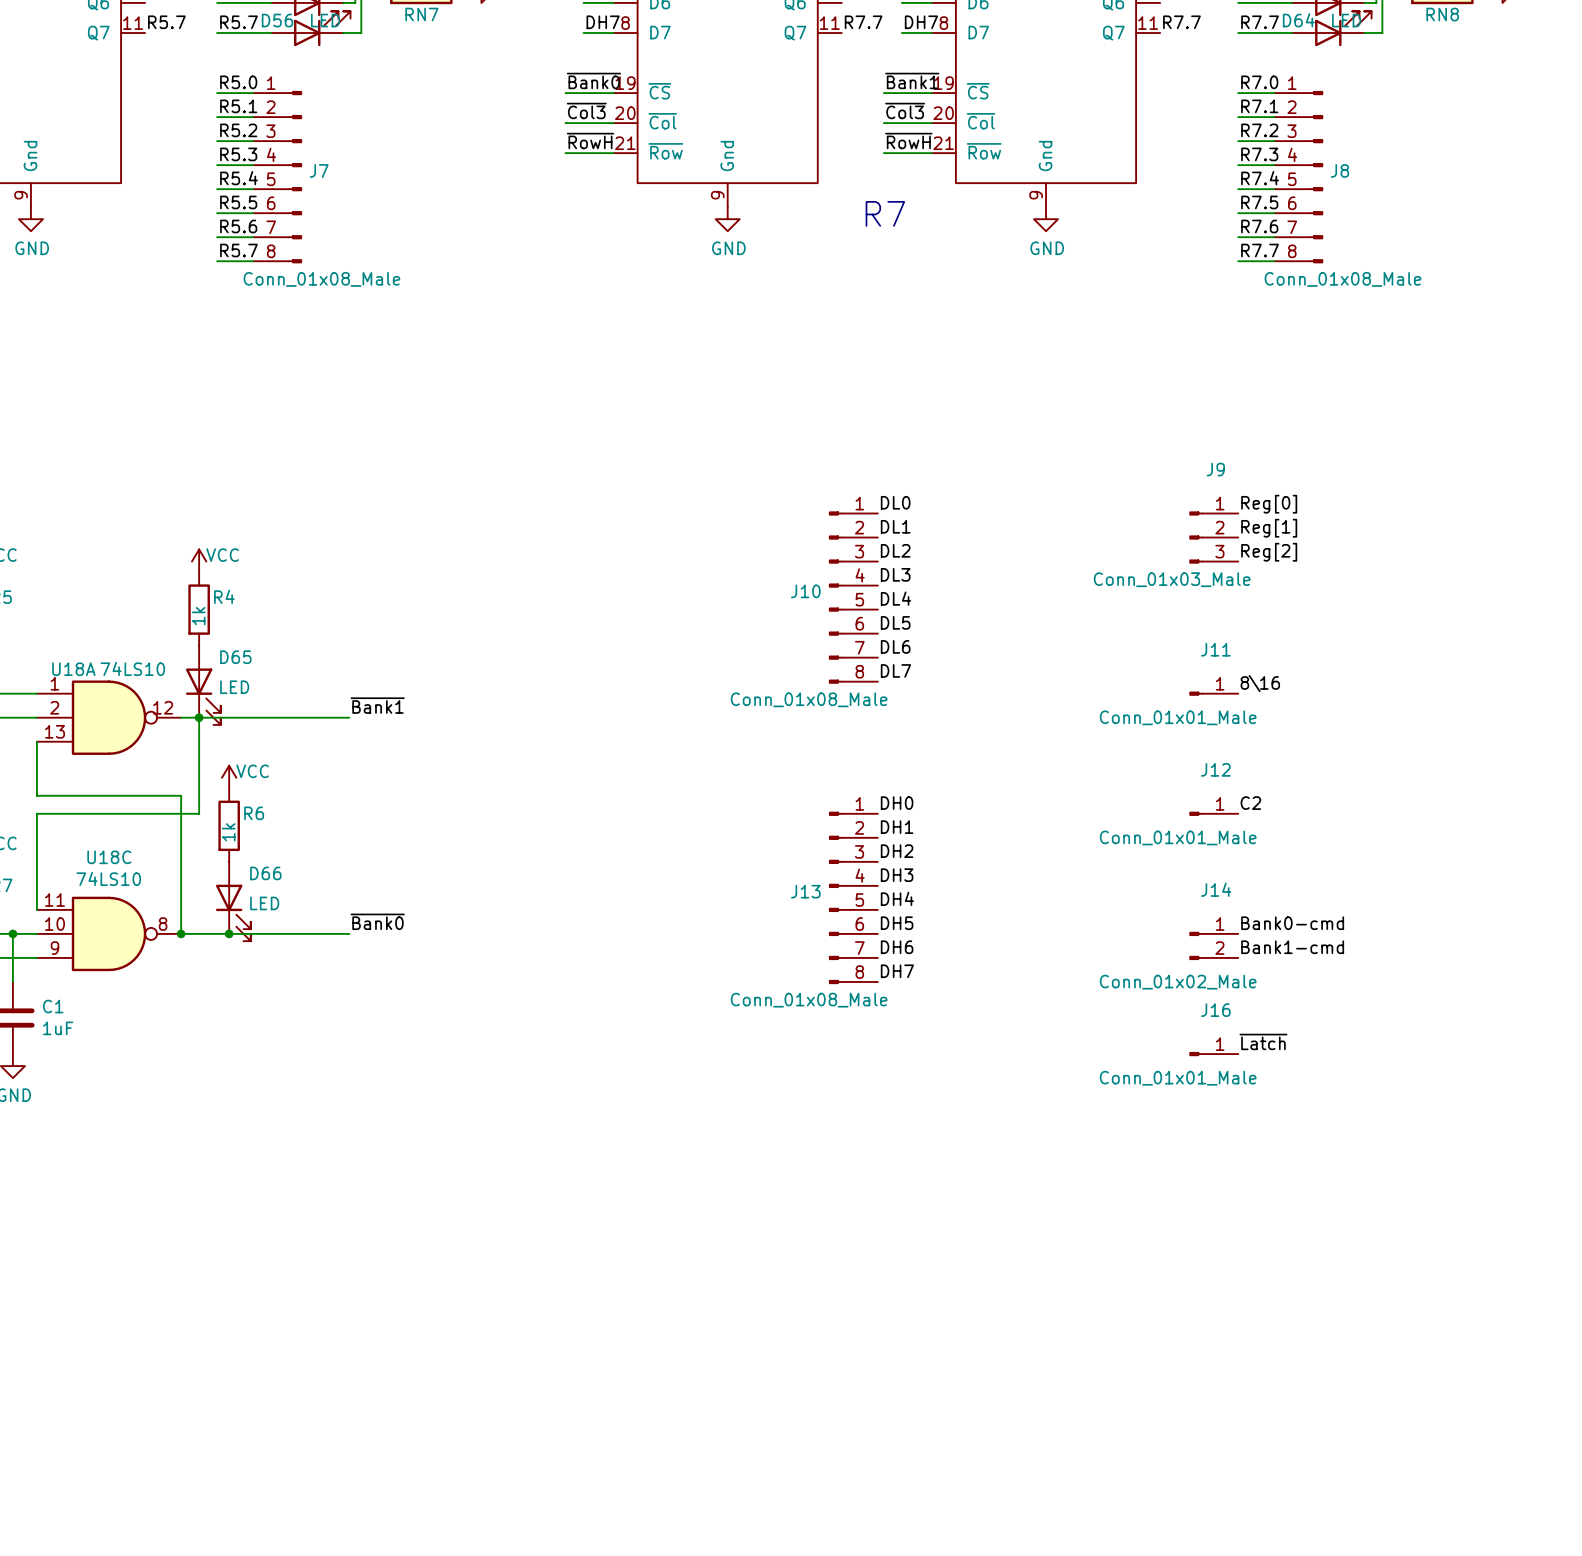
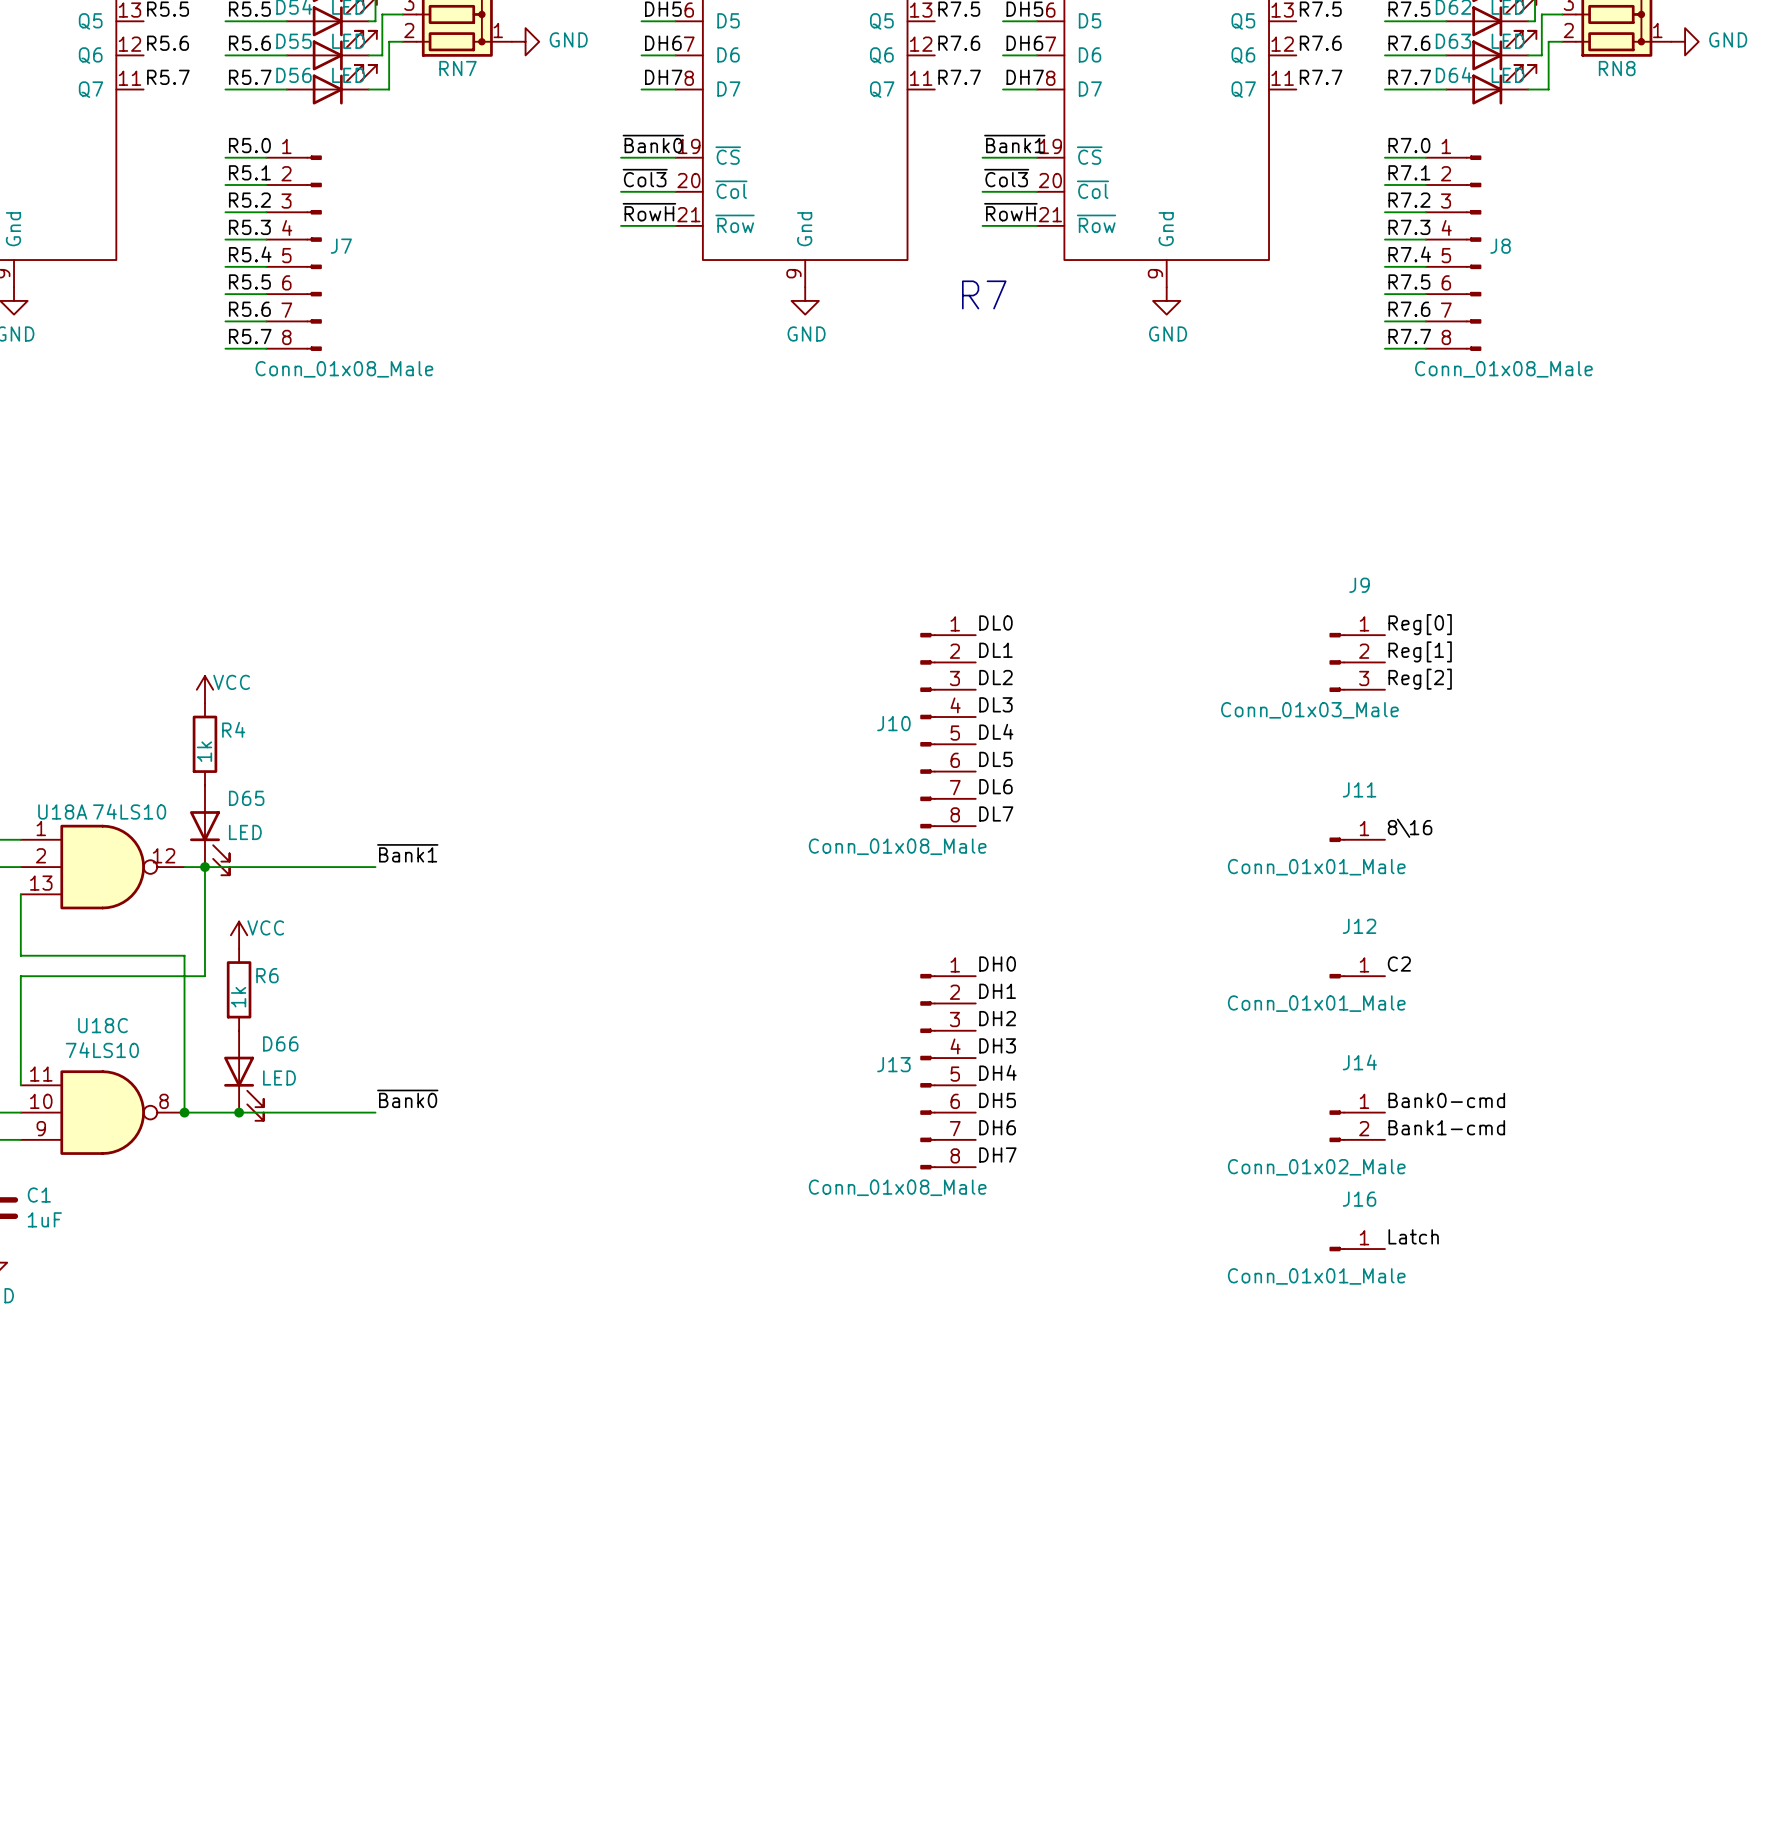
label: ~{Latch} (1263, 1041) -> Latch (1413, 1236)

